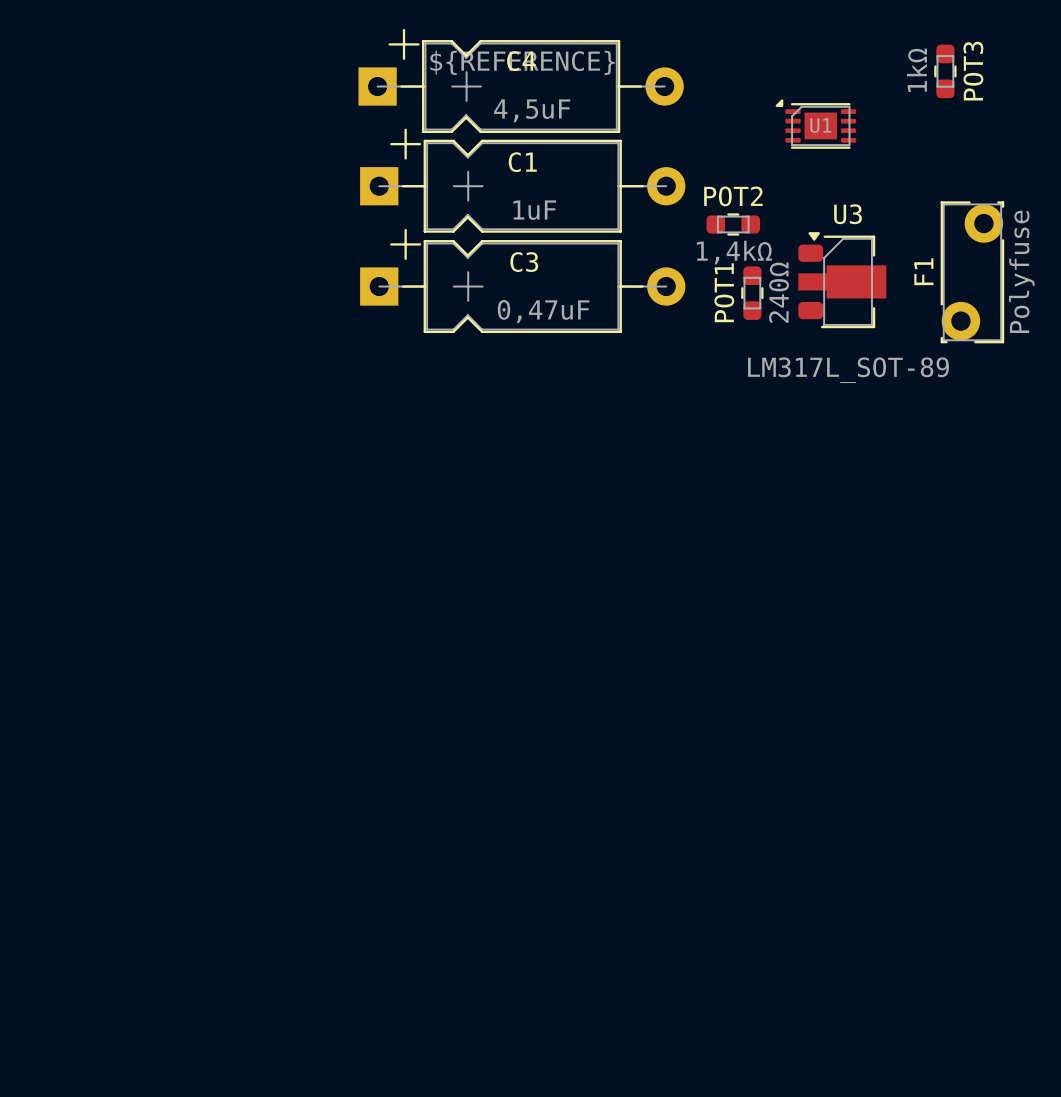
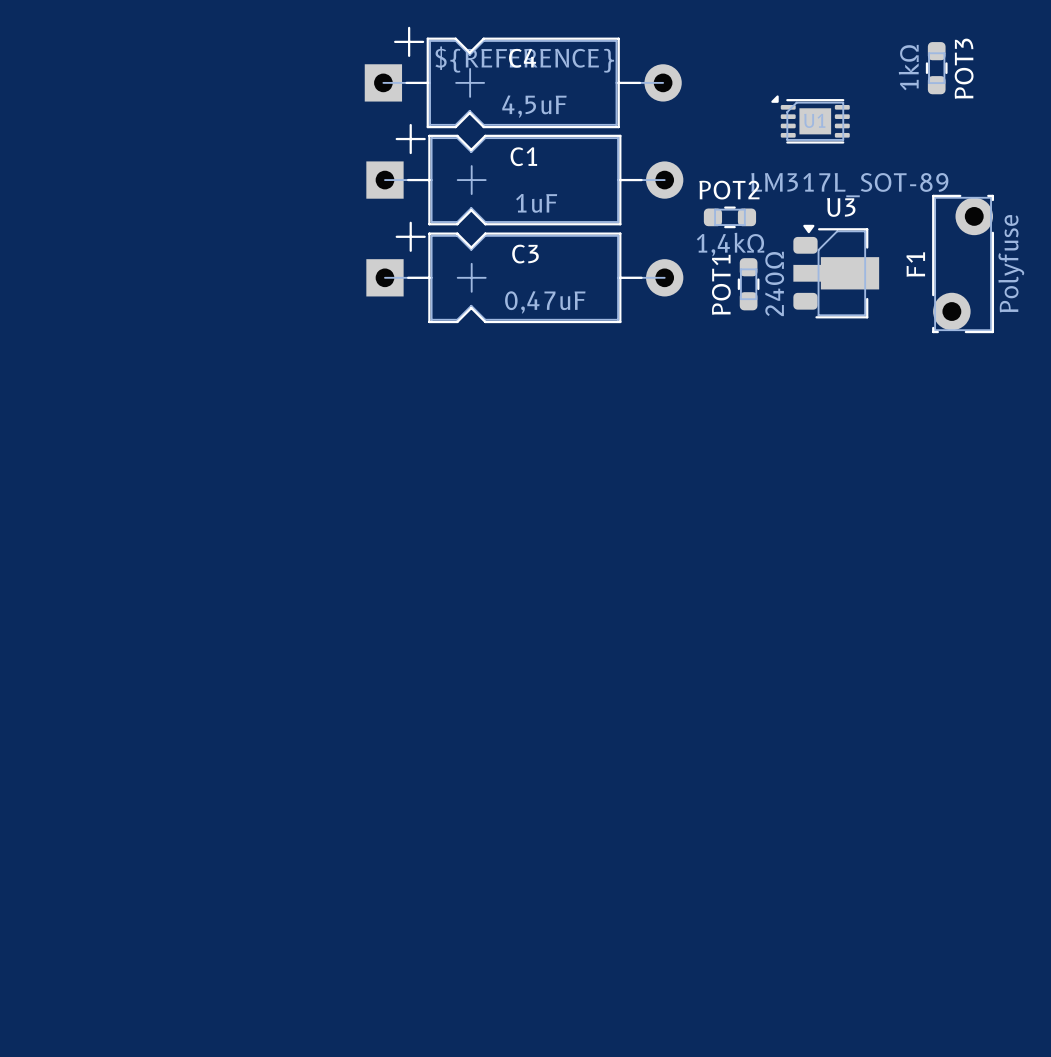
U3 value position: LM317L_SOT-89 (848, 370) -> LM317L_SOT-89 (849, 185)

